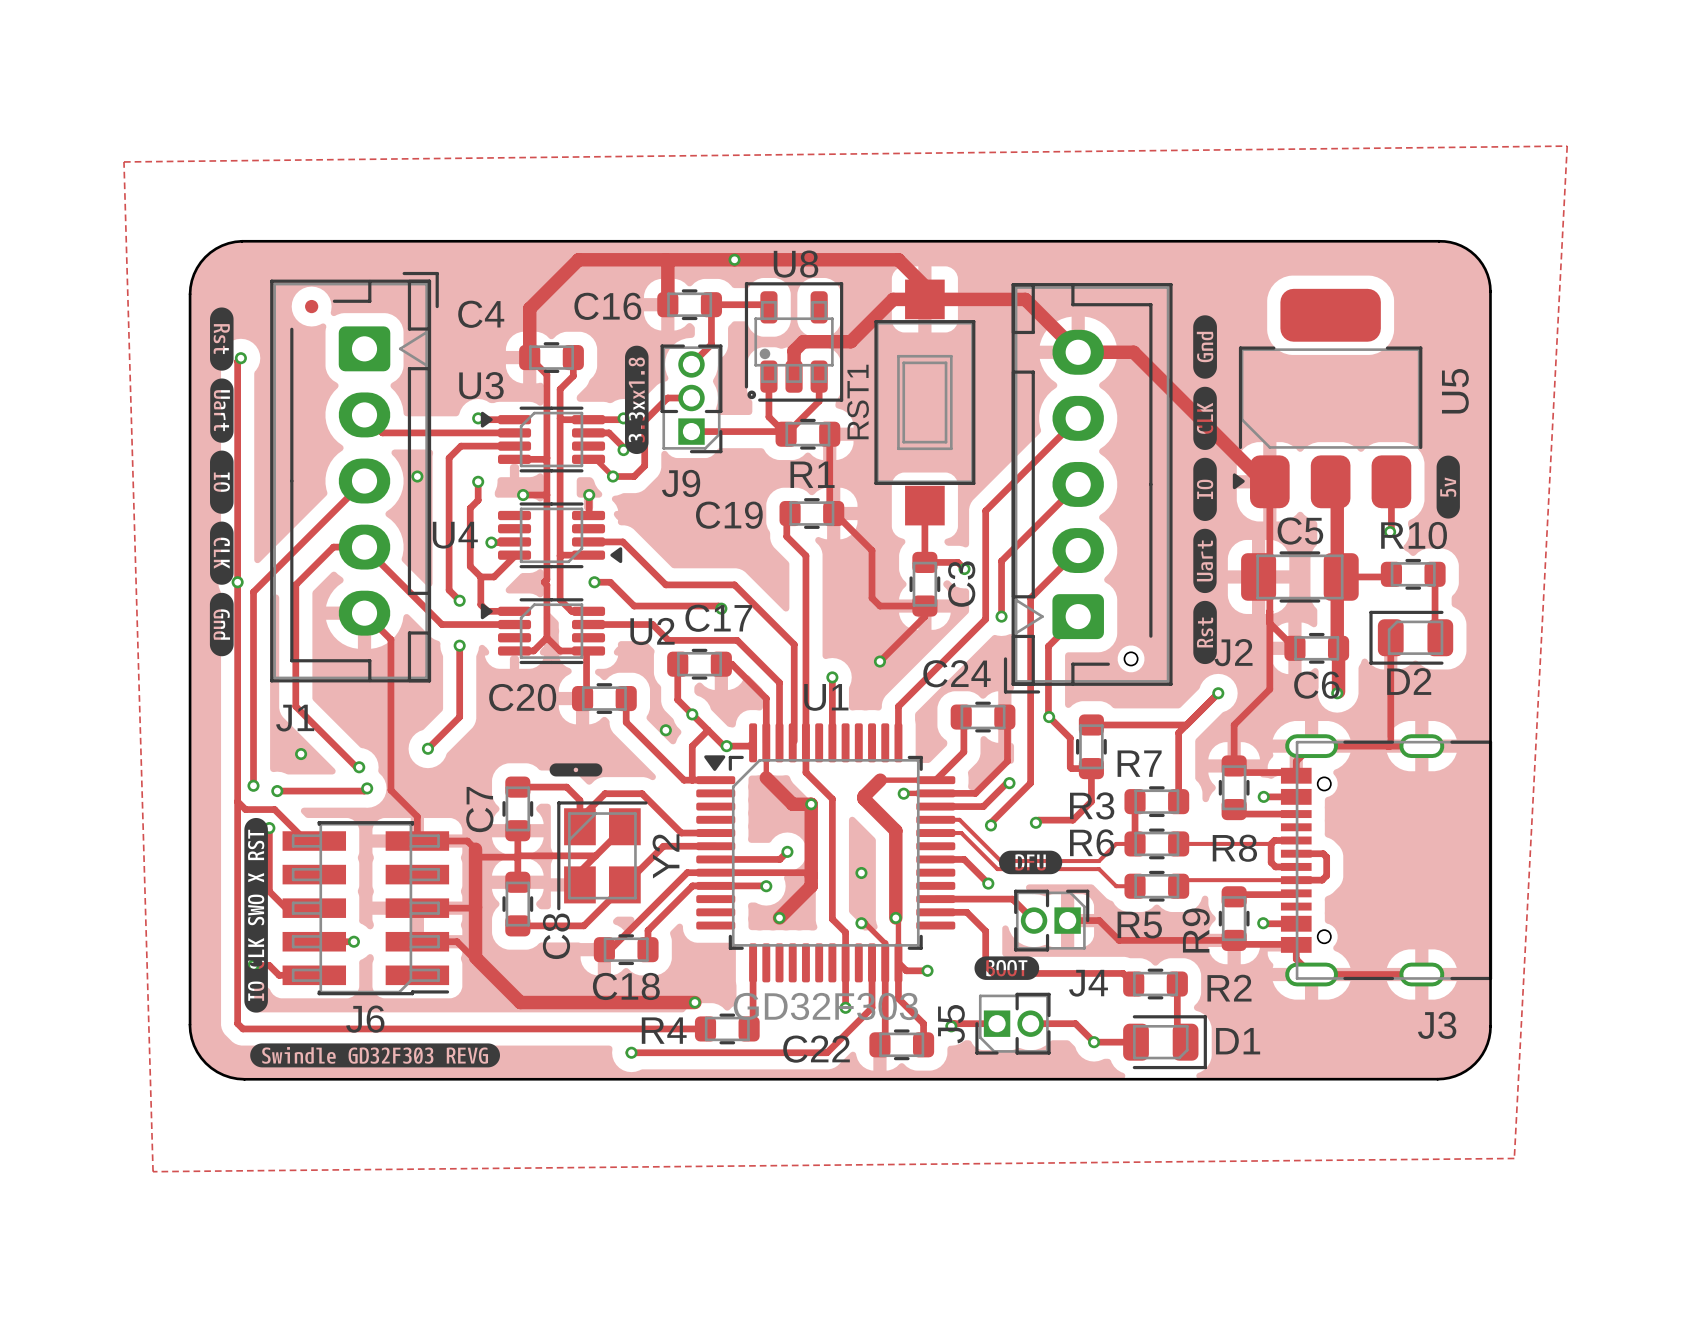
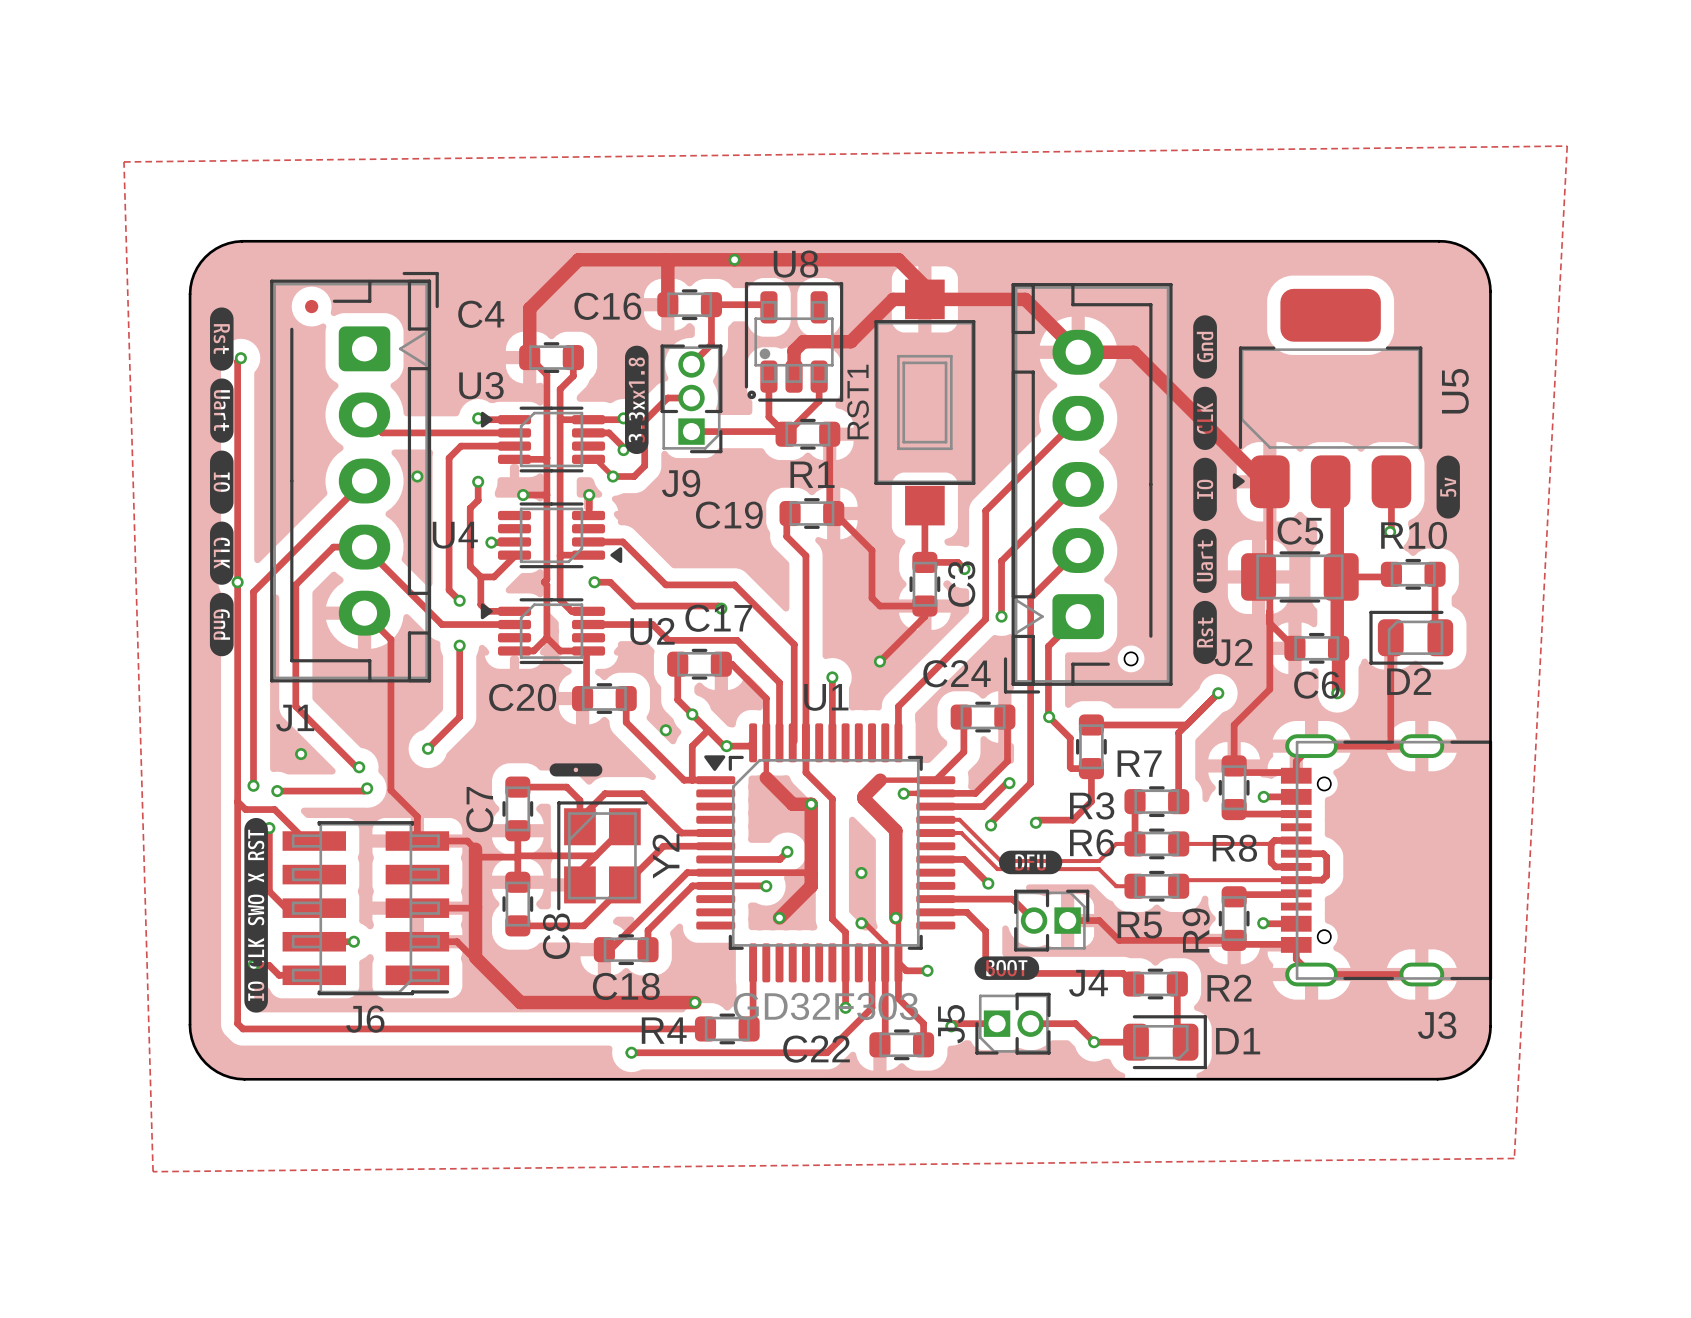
drawing: [250, 1043, 500, 1068] -> none

